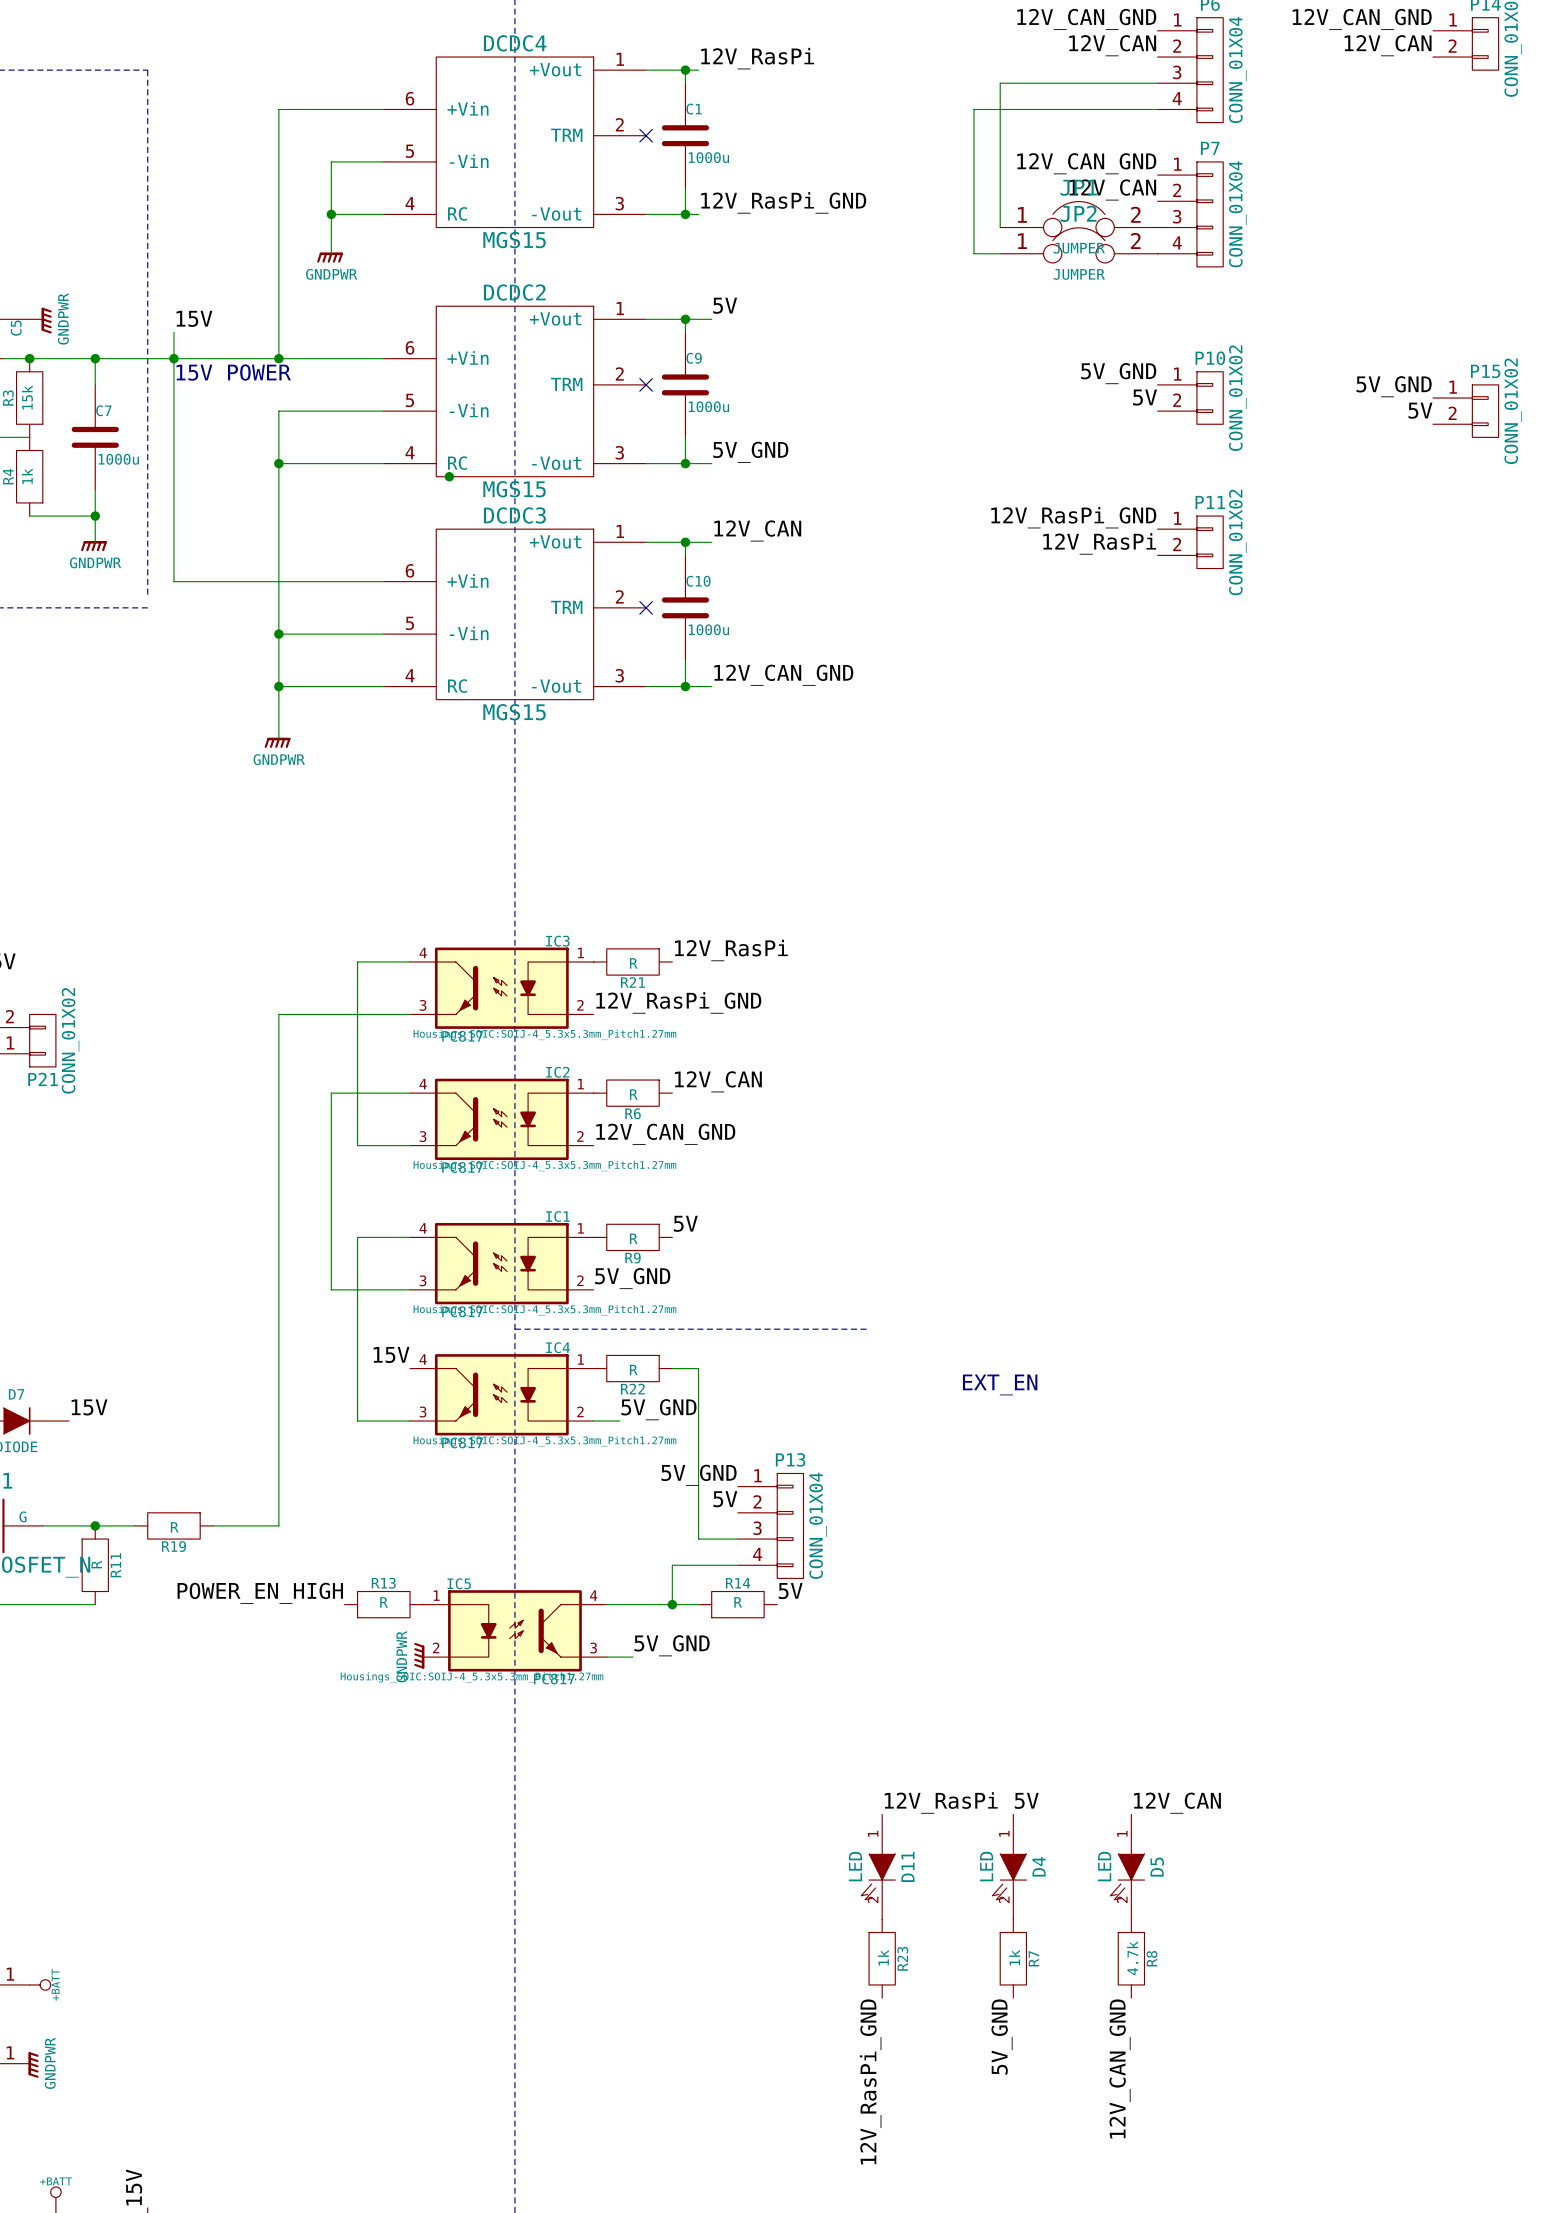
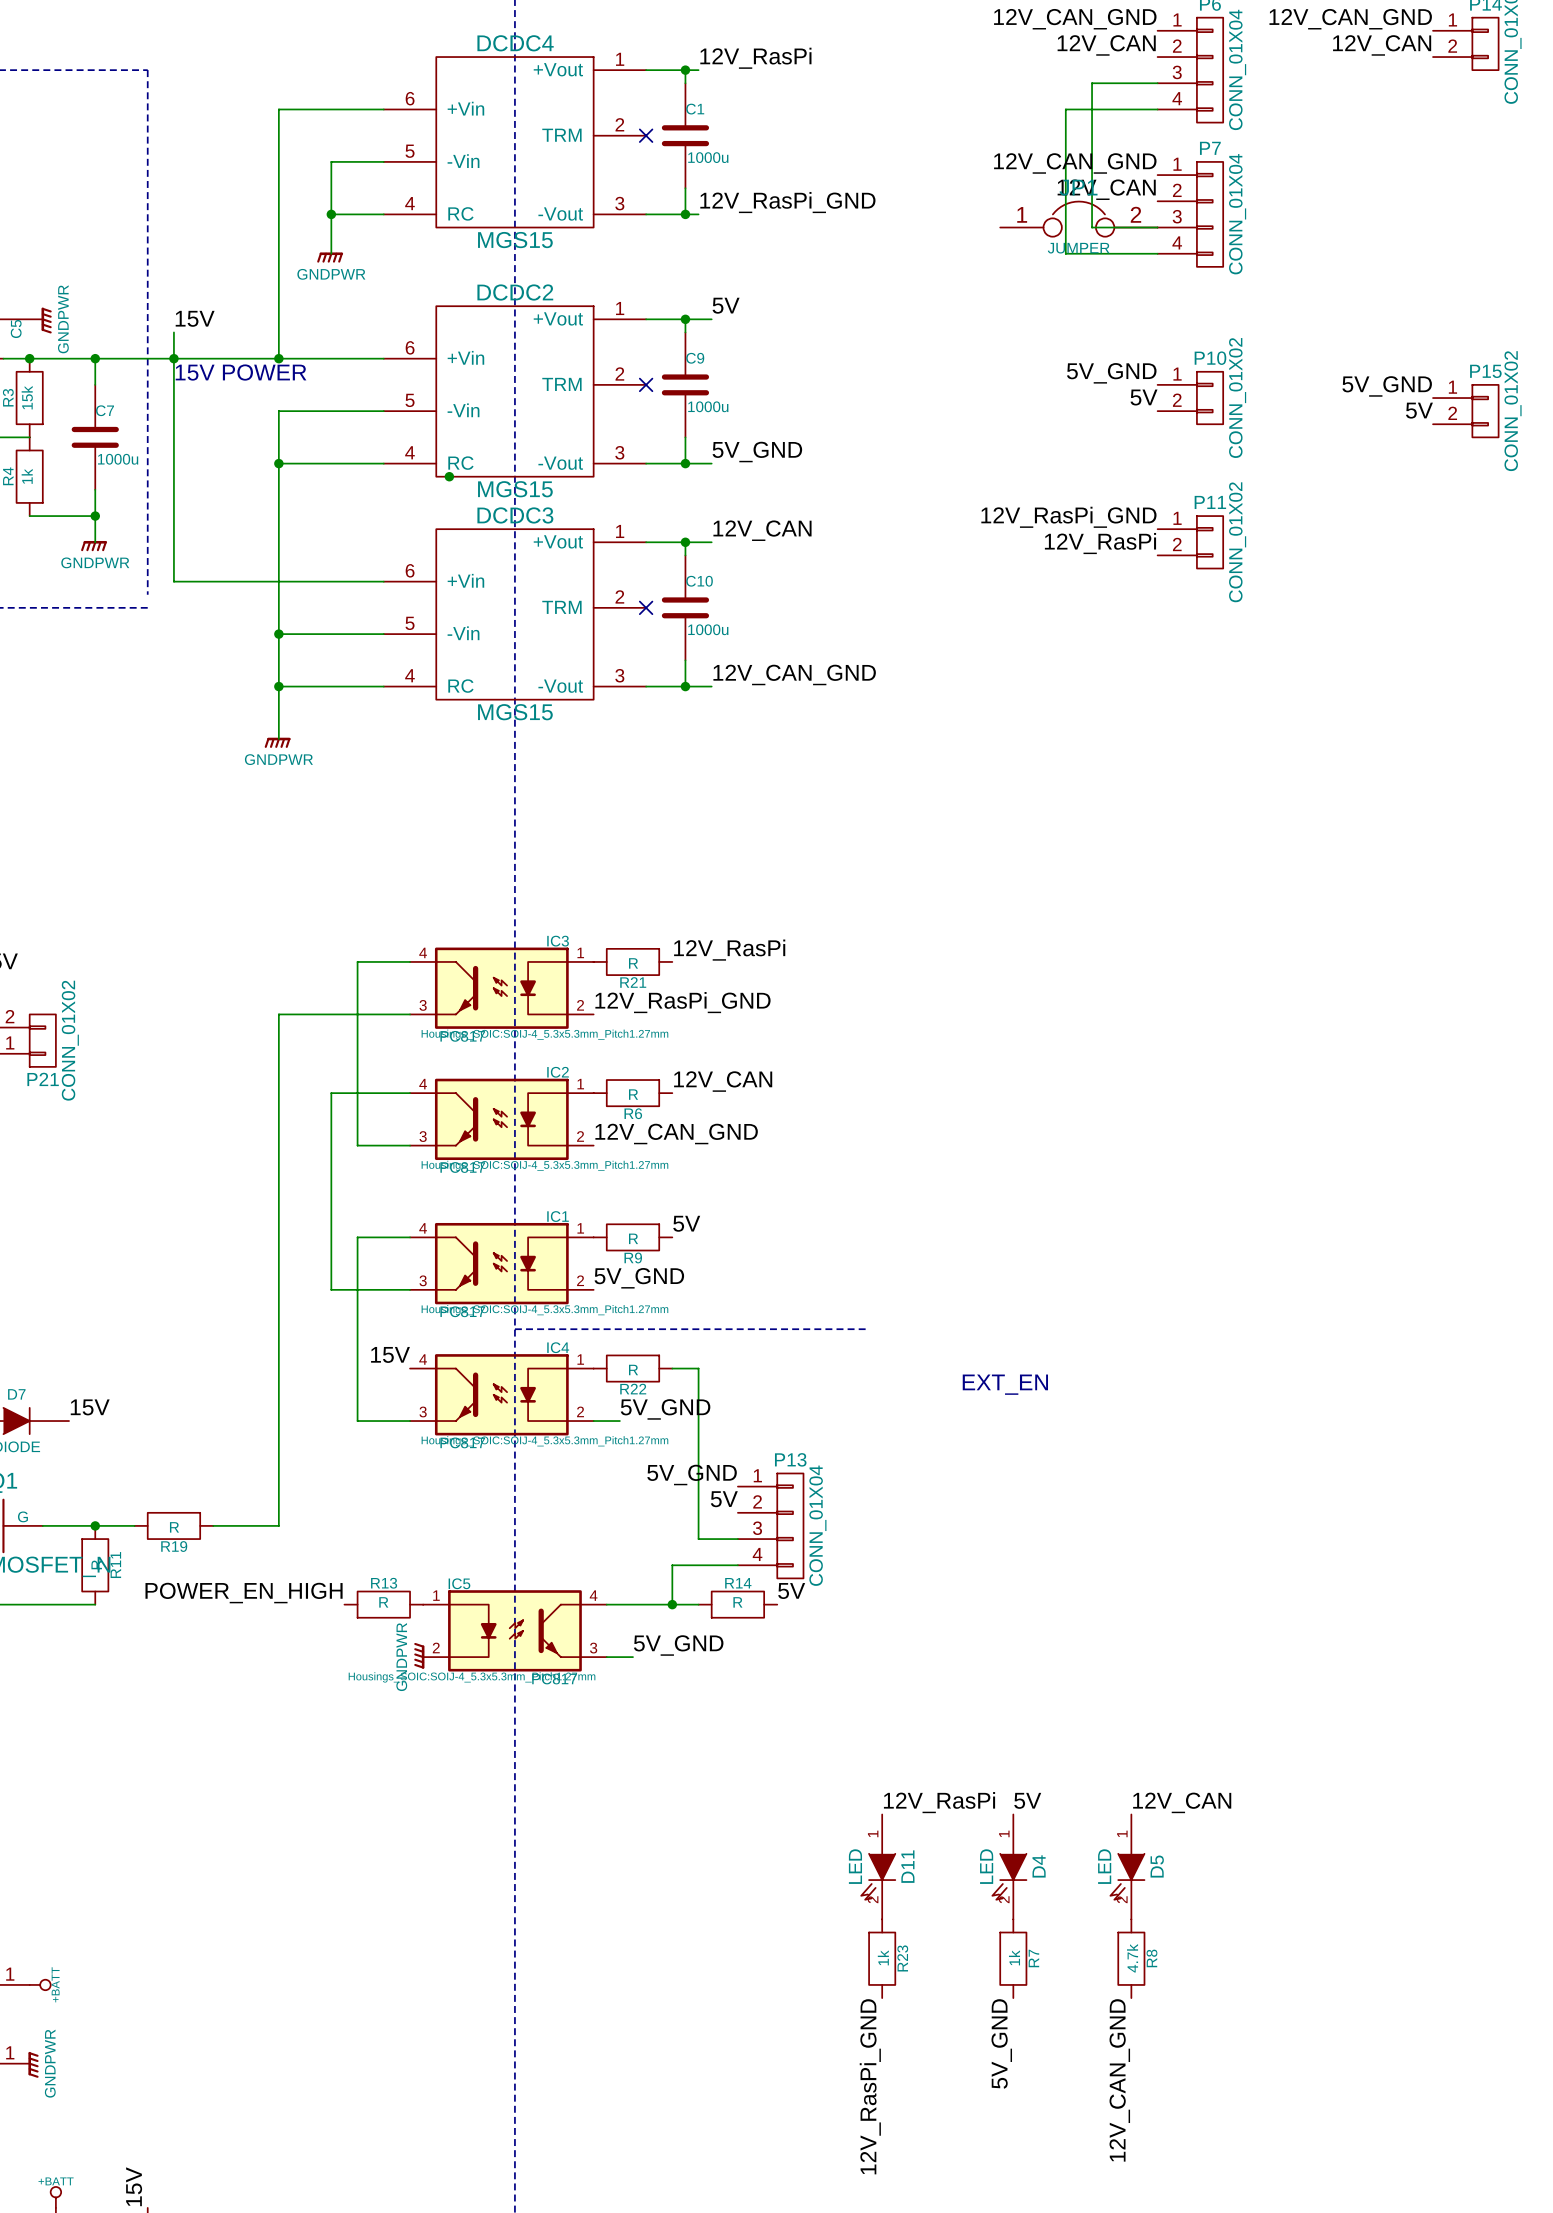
wire: (1092, 83) (1000, 83) (1000, 227) -> (1092, 83) (1092, 227) (1157, 227)
wire: (1065, 109) (973, 109) (973, 253) (1000, 253) -> (1065, 109) (1065, 253) (1157, 253)
JP2: JUMPER (1078, 245) -> none

